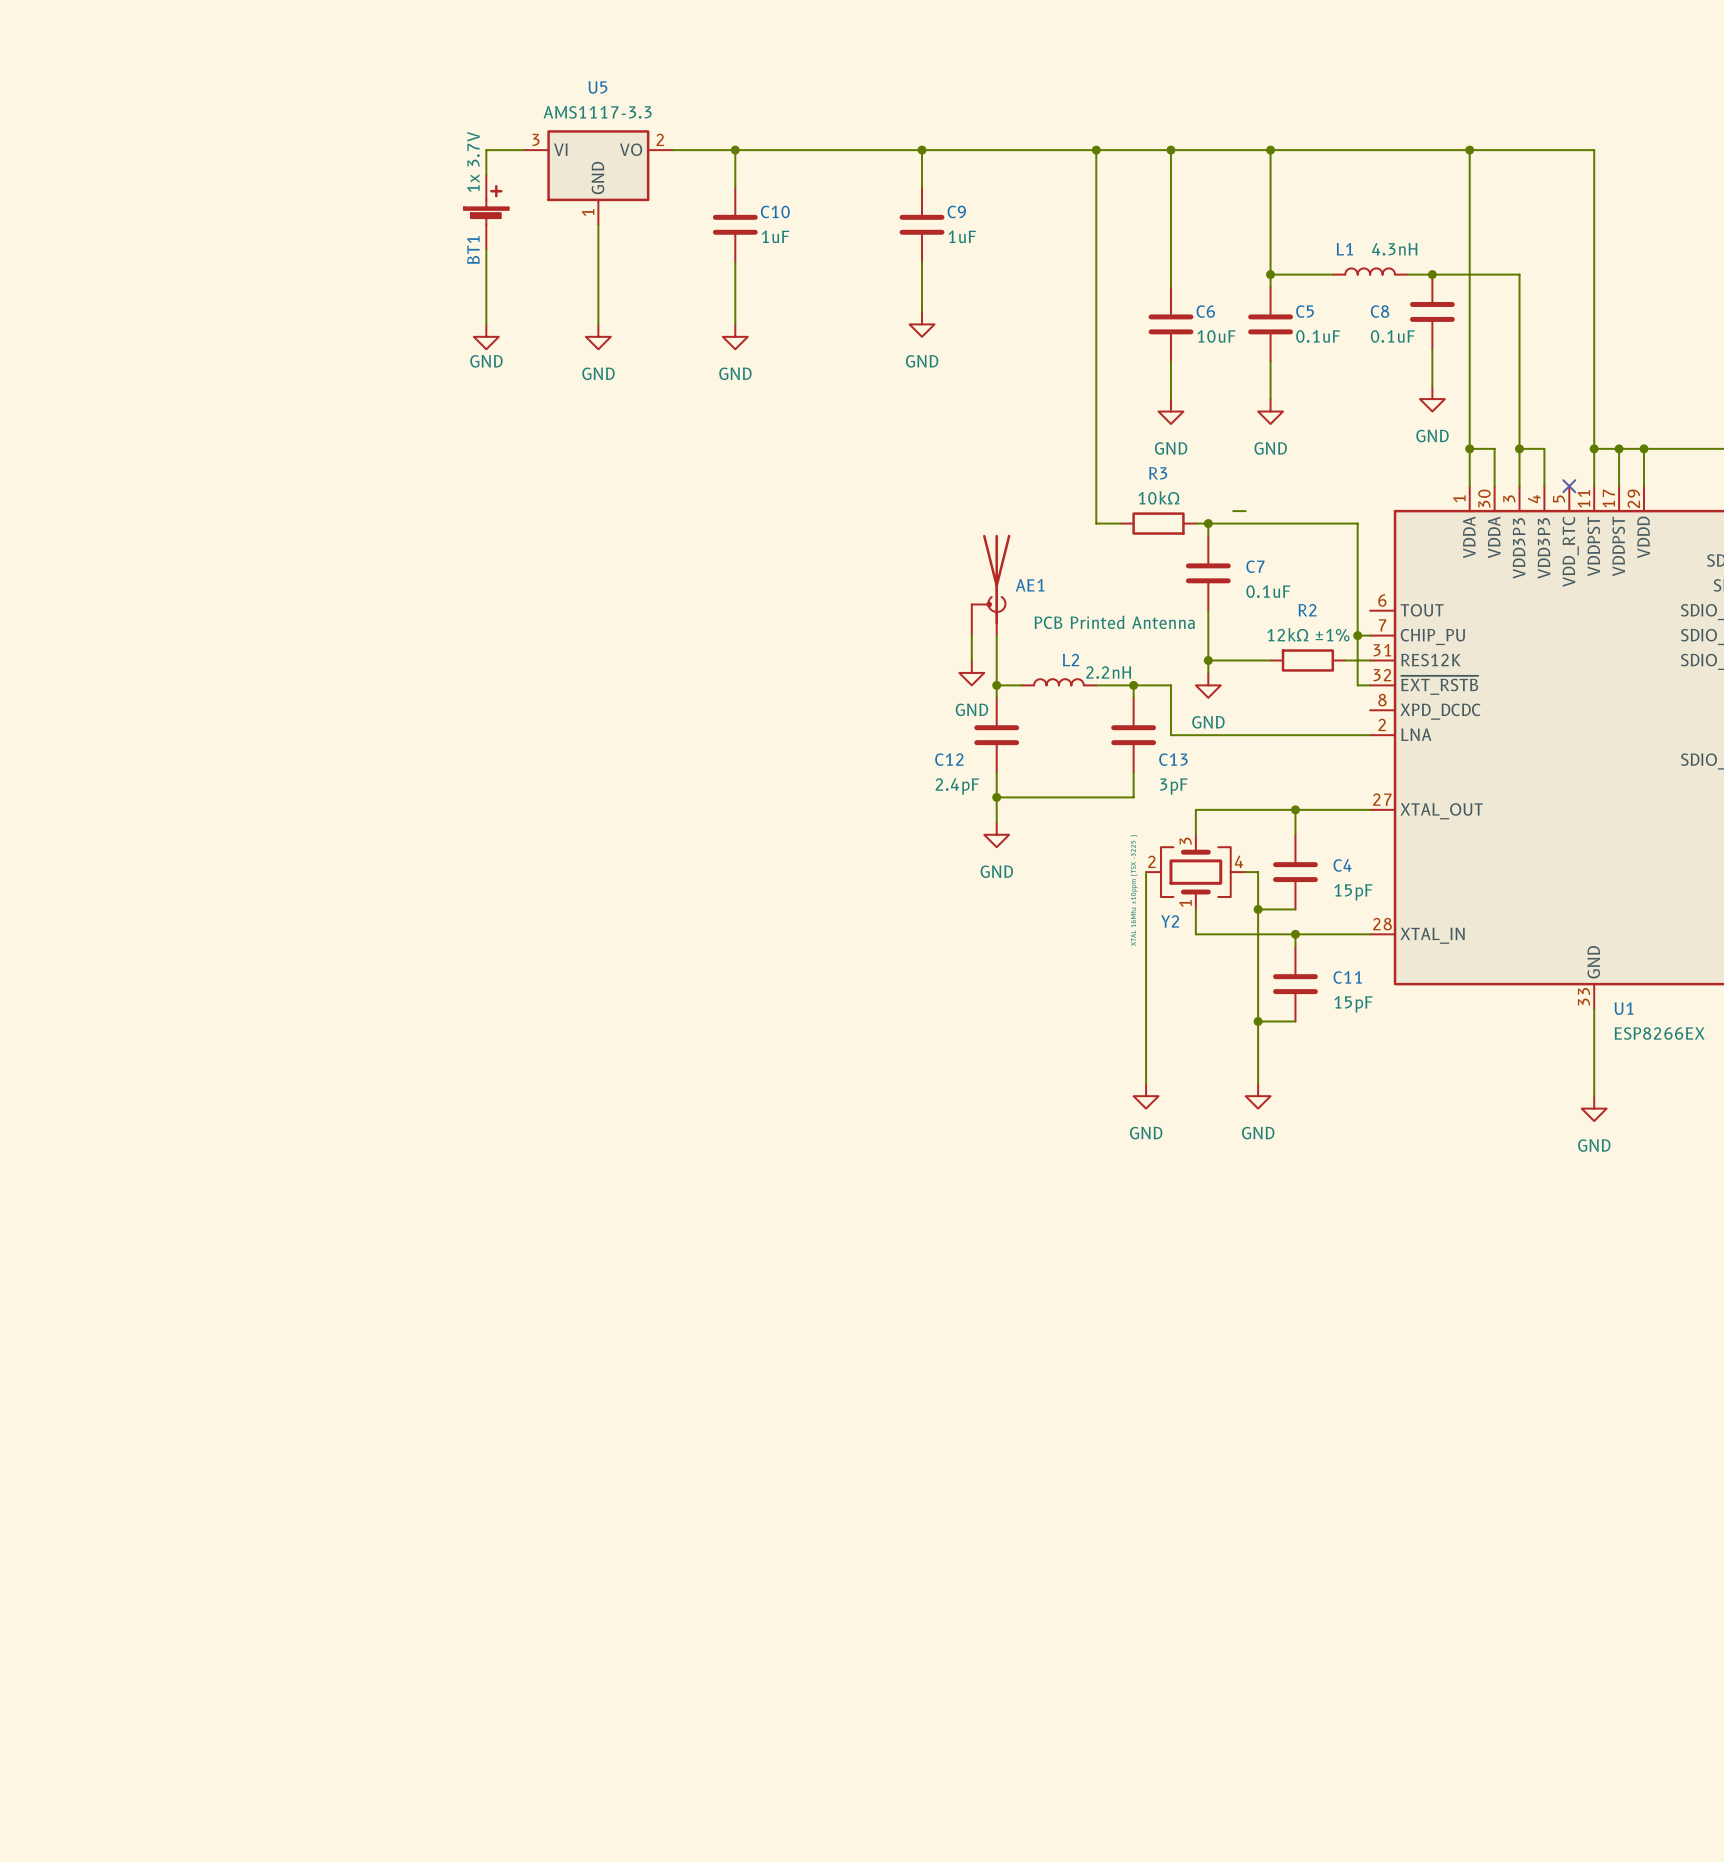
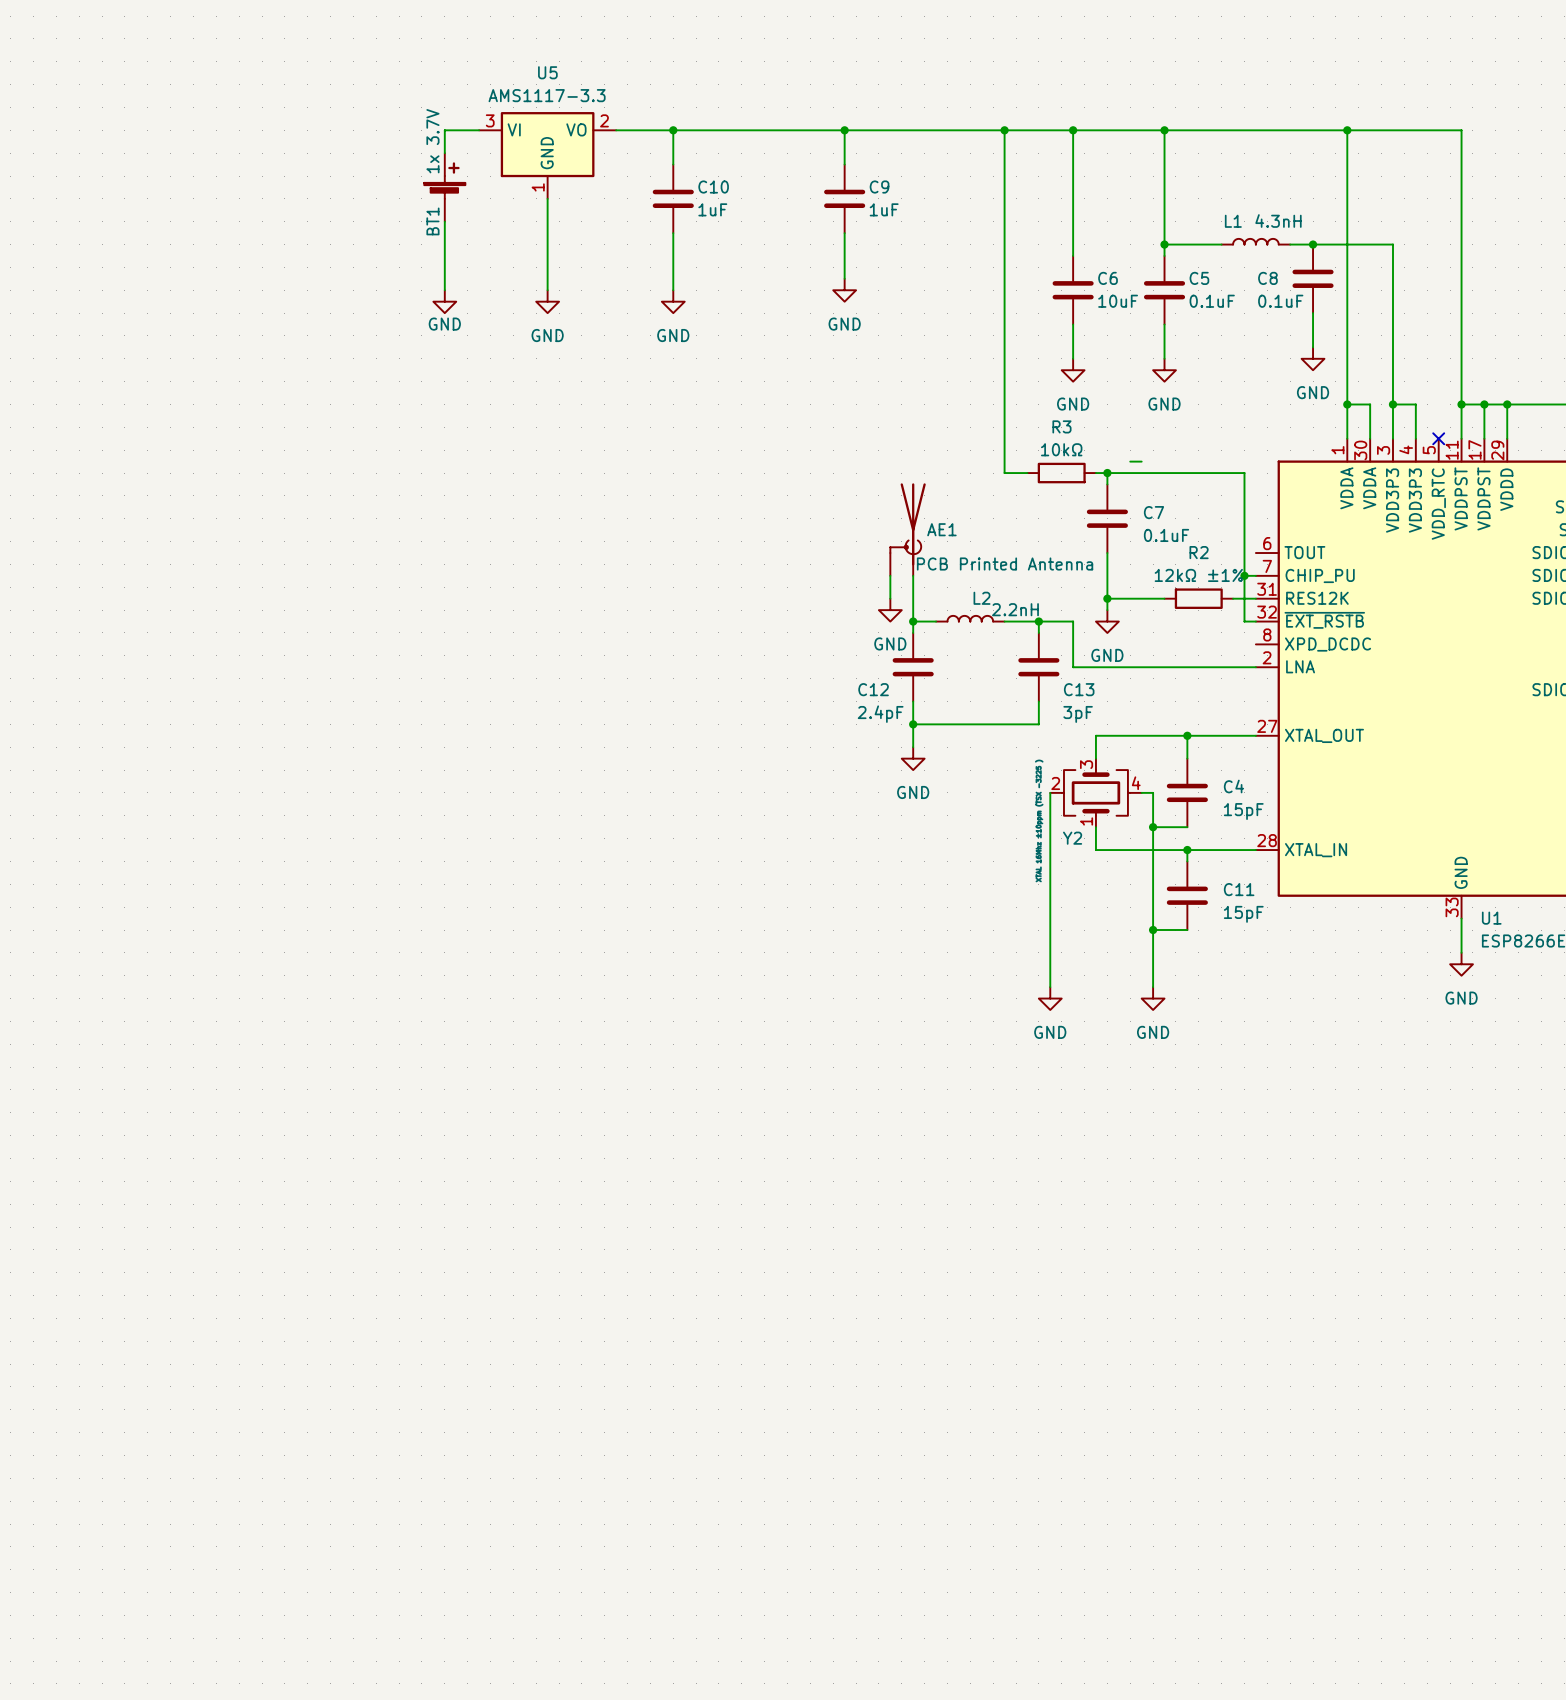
wire: (1594, 1046) (1594, 1096) -> none
power symbol position: GND (1594, 1108) -> GND (1461, 964)

